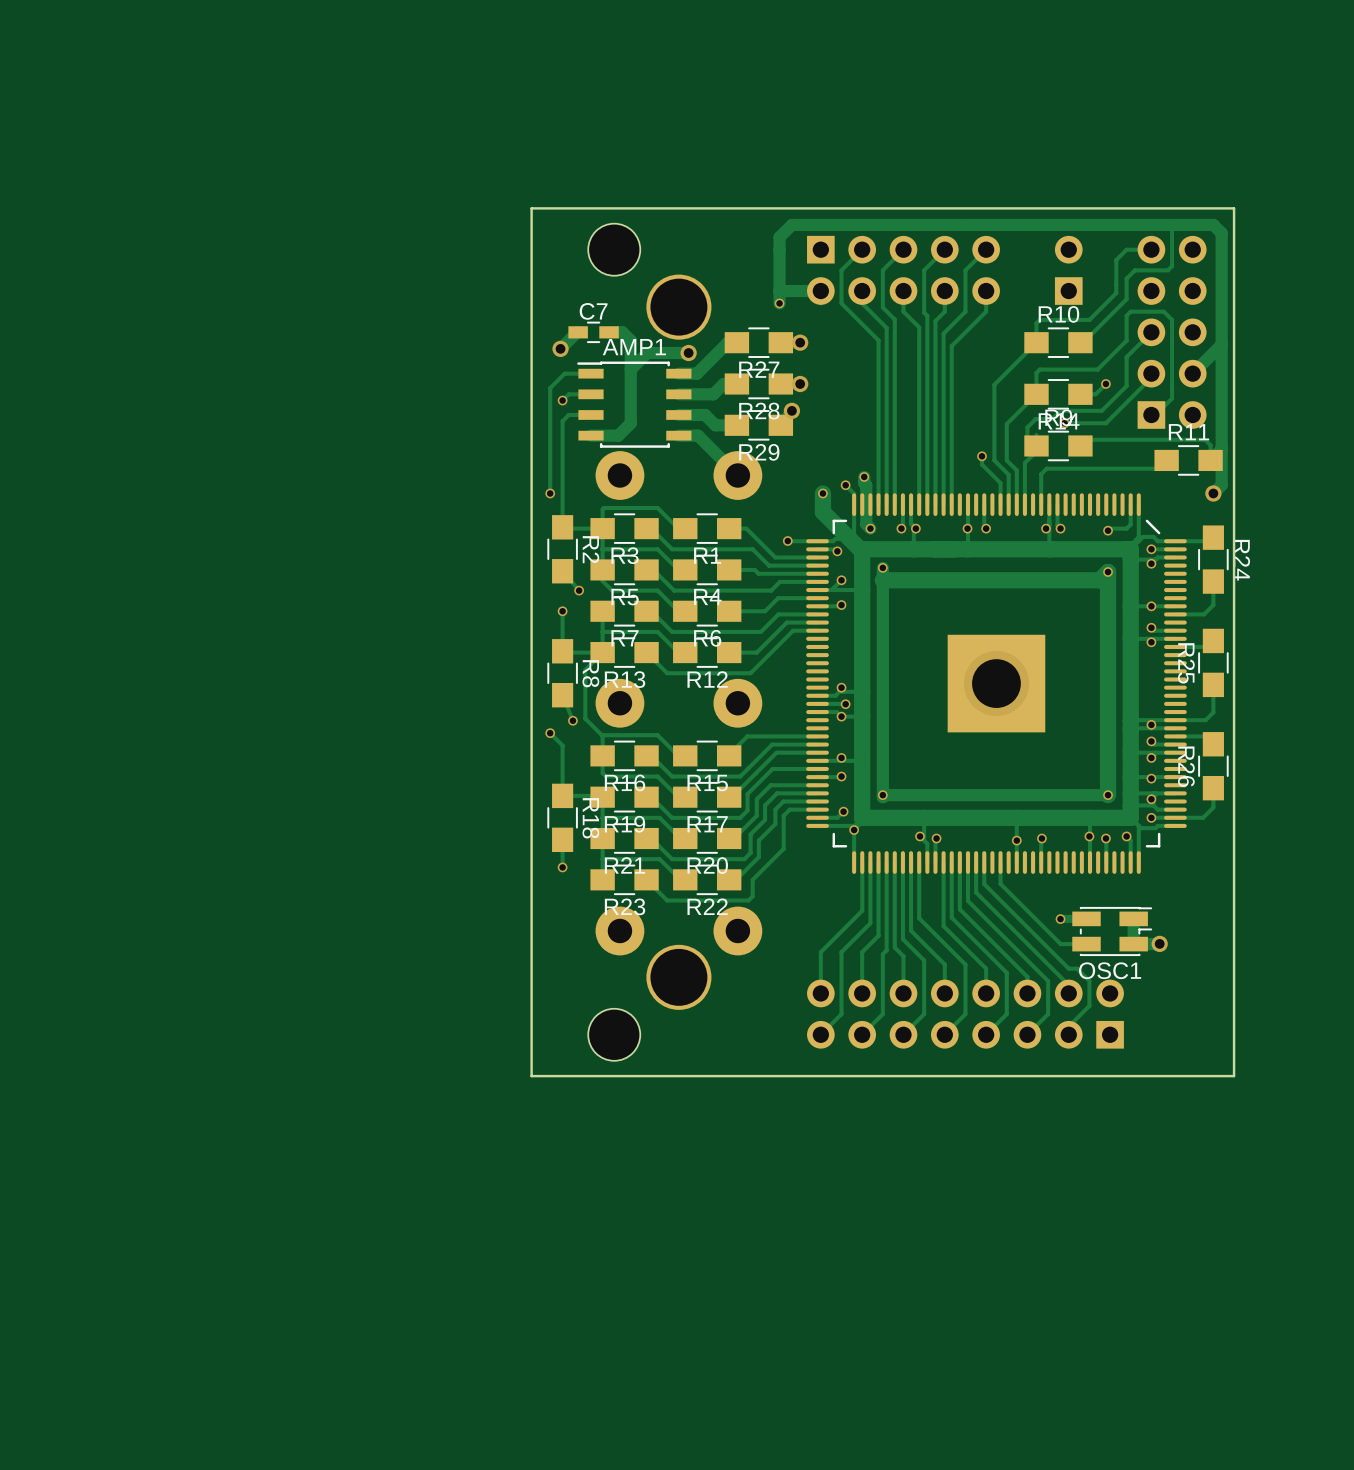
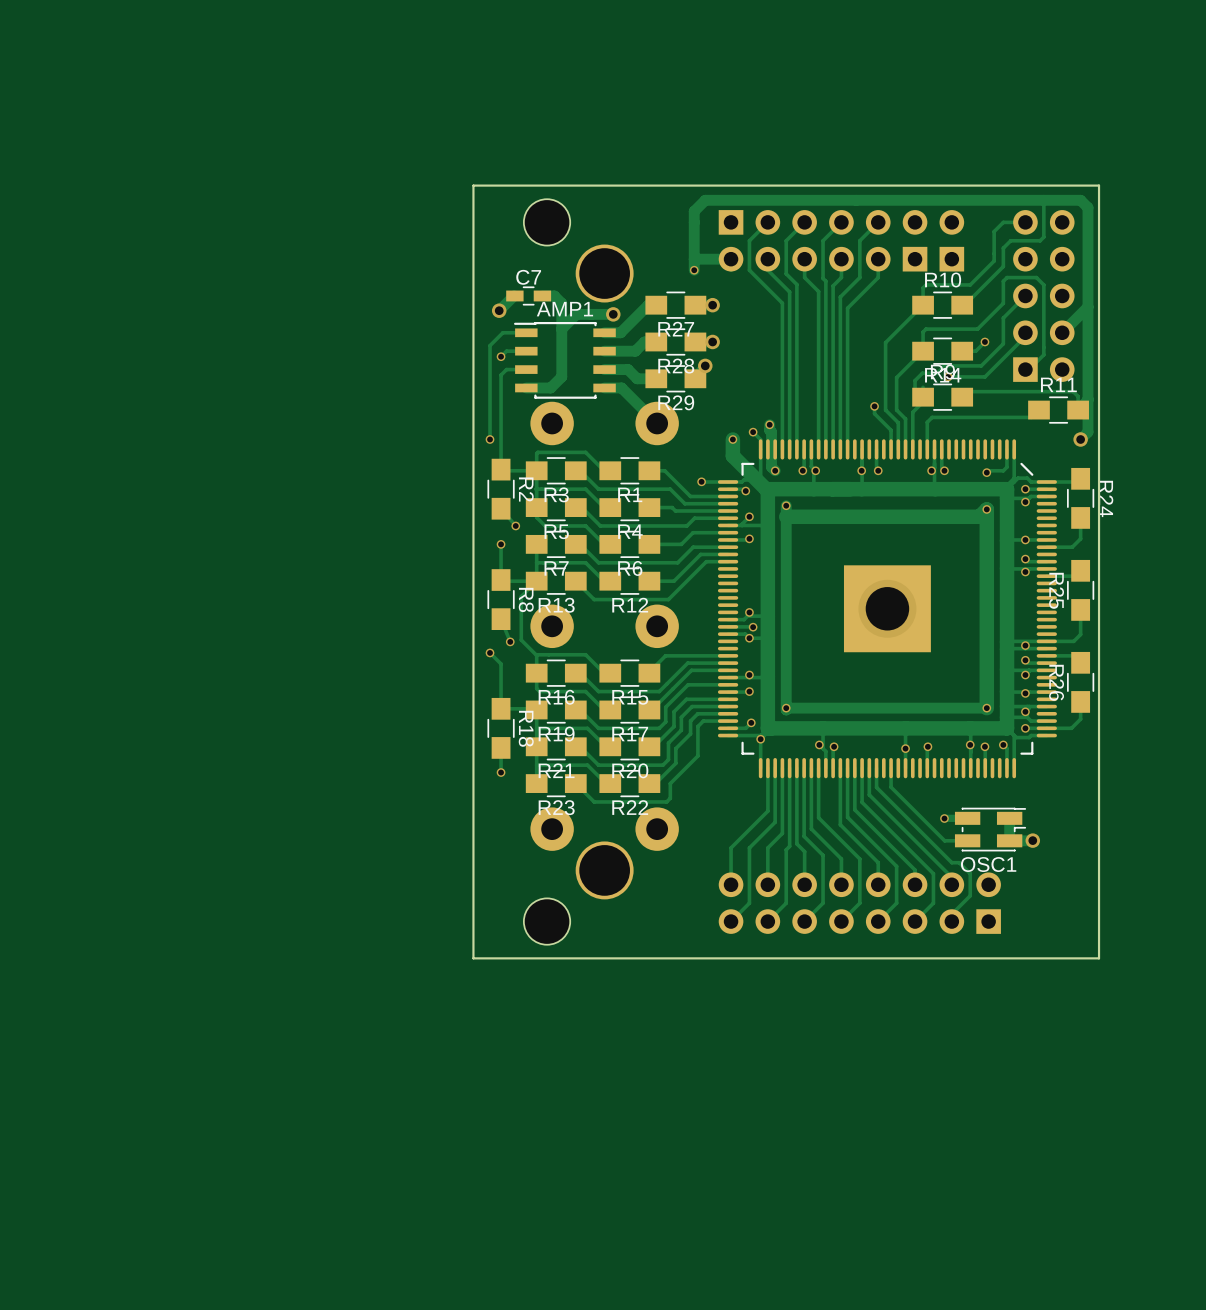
part: none -> (915, 240)

